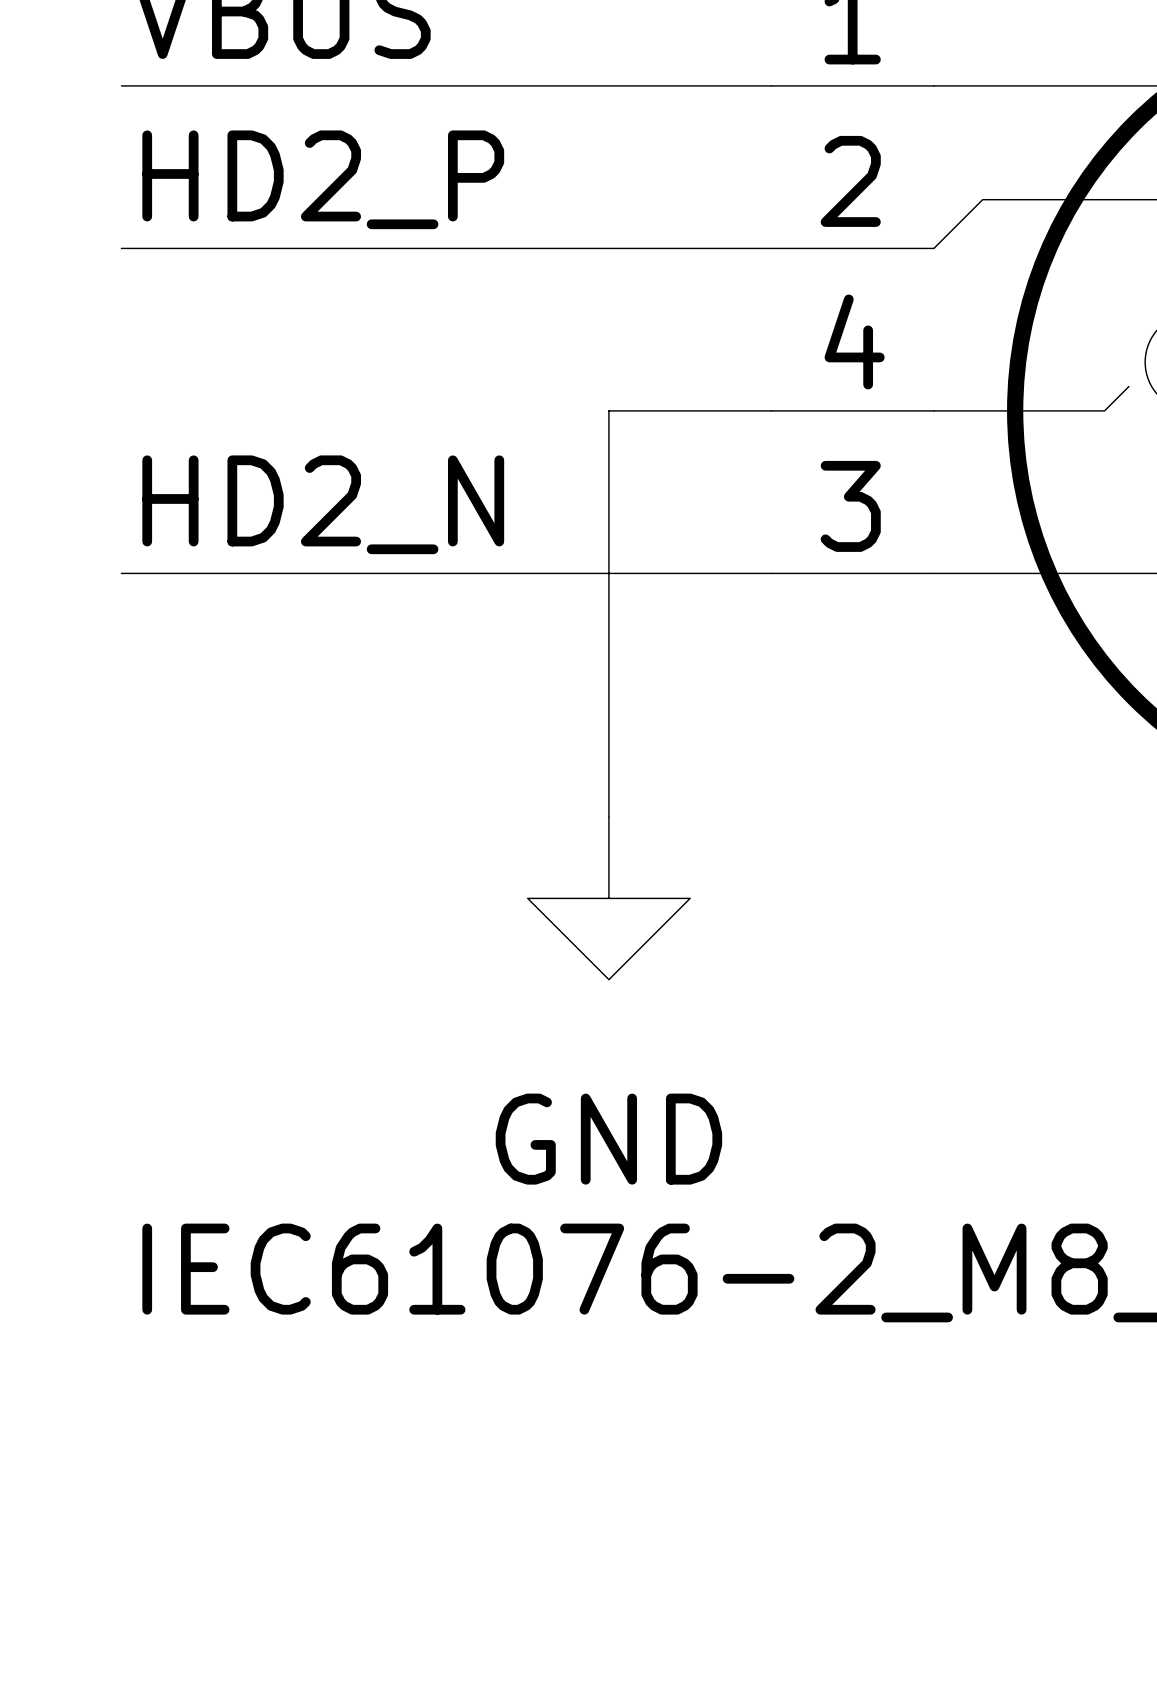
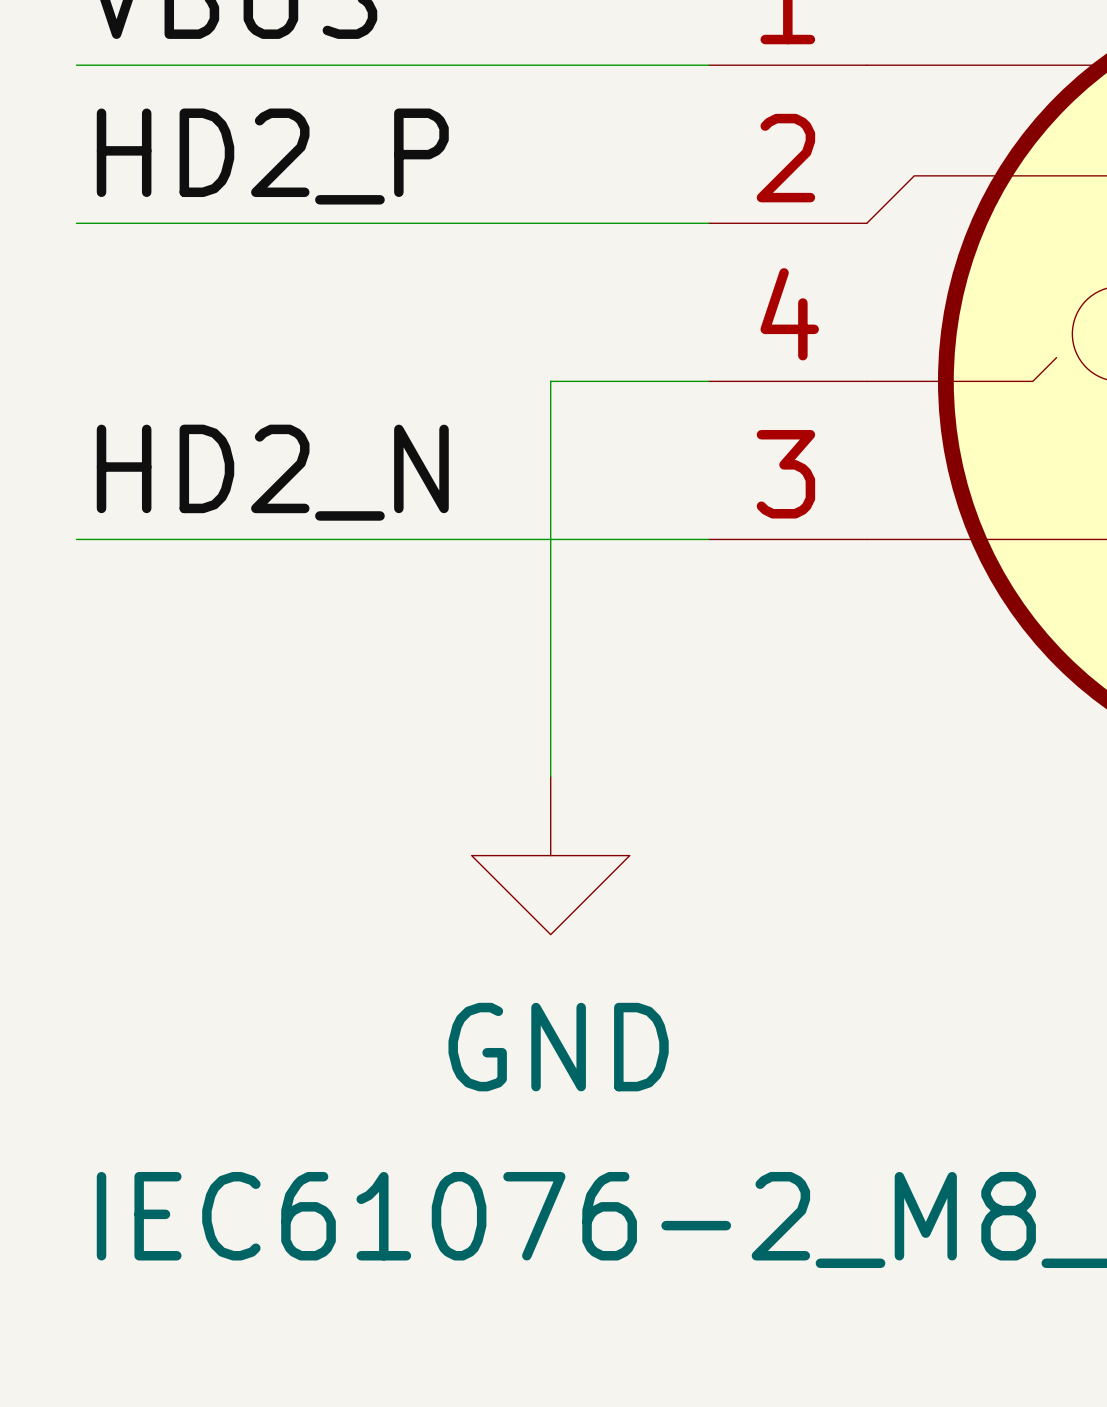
power symbol text position: GND (608, 1139) -> GND (558, 1047)

